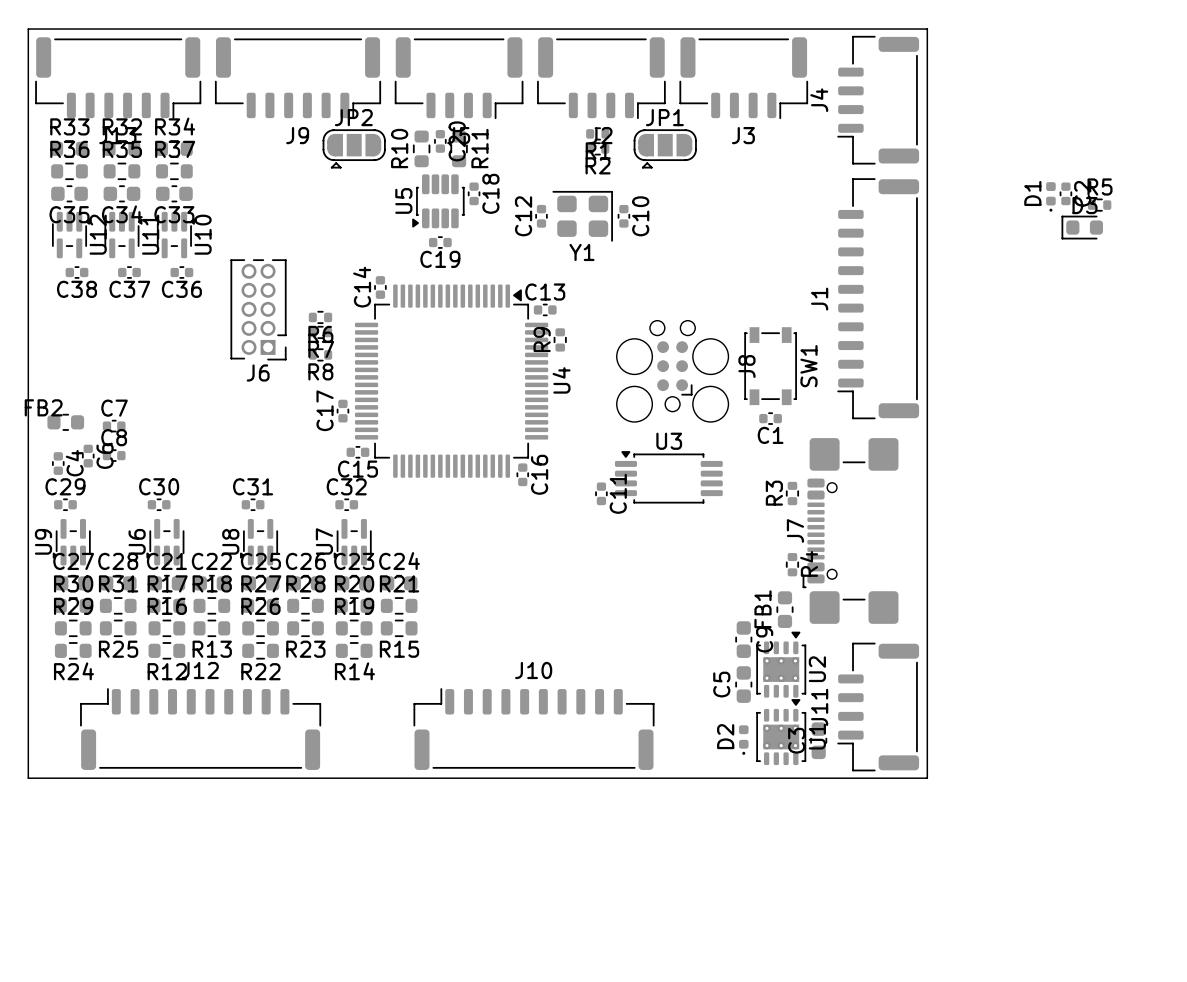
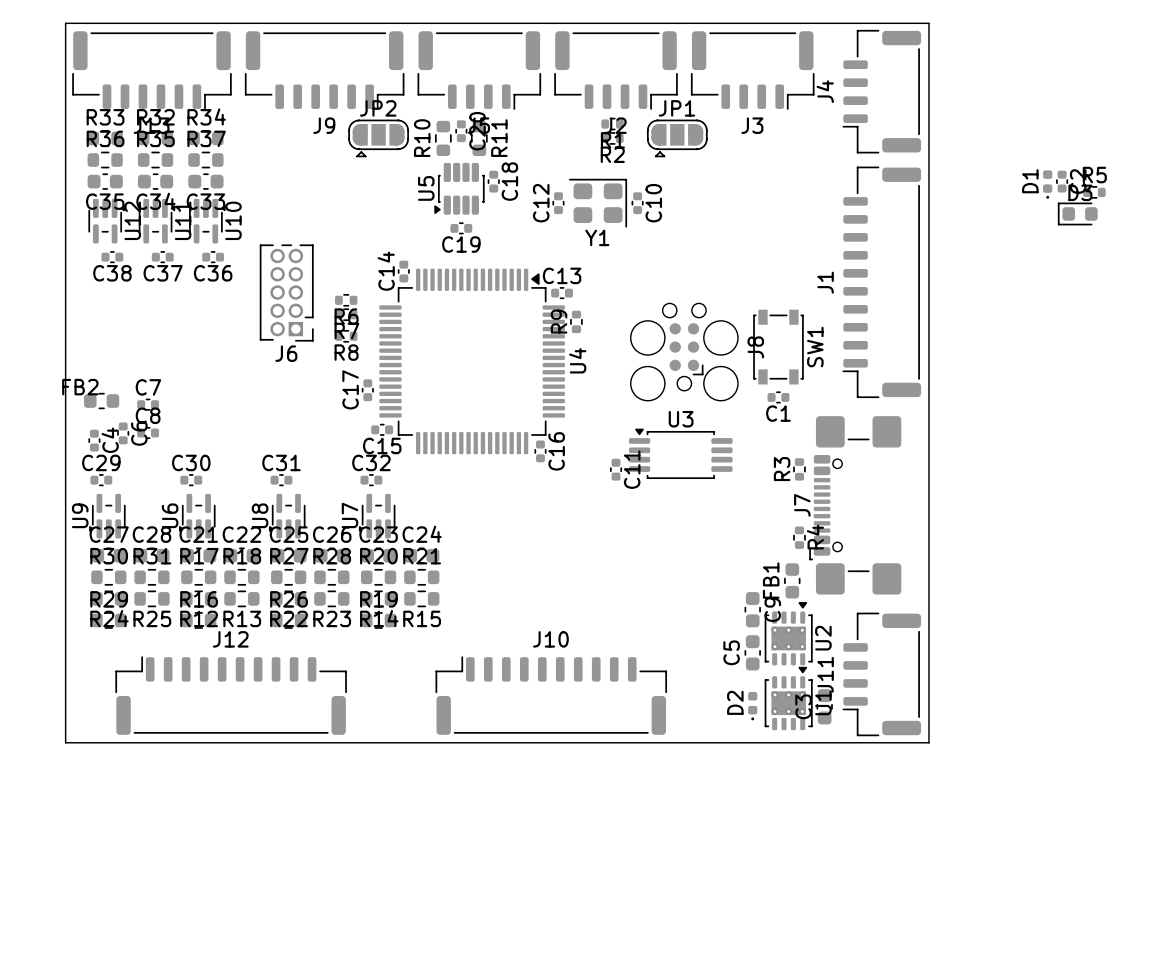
R29 name: R29 (73, 606) -> R24 (109, 618)
R16 name: R16 (167, 606) -> R12 (199, 618)
R26 name: R26 (260, 606) -> R22 (289, 618)
R19 name: R19 (354, 606) -> R14 (379, 618)
R24 name: R24 (73, 671) -> R29 (109, 599)
R12 name: R12 (167, 671) -> R16 (199, 599)
R22 name: R22 (260, 671) -> R26 (289, 599)
R14 name: R14 (354, 671) -> R19 (378, 599)

